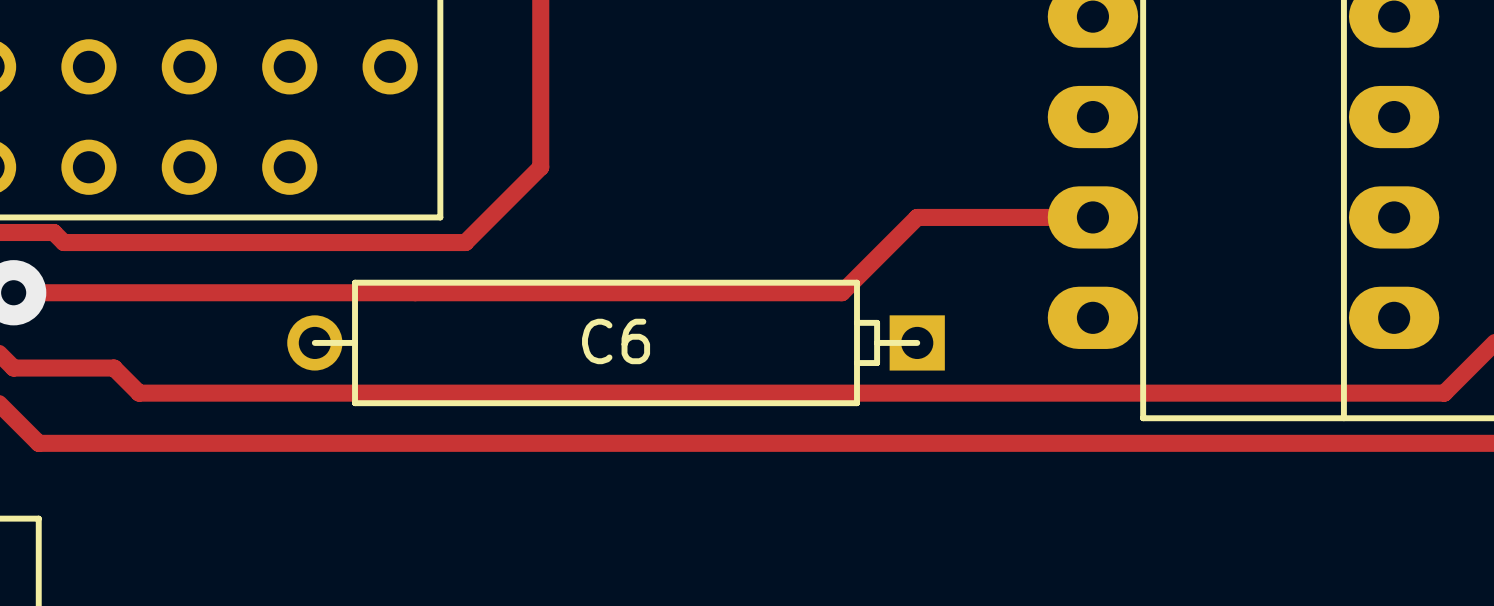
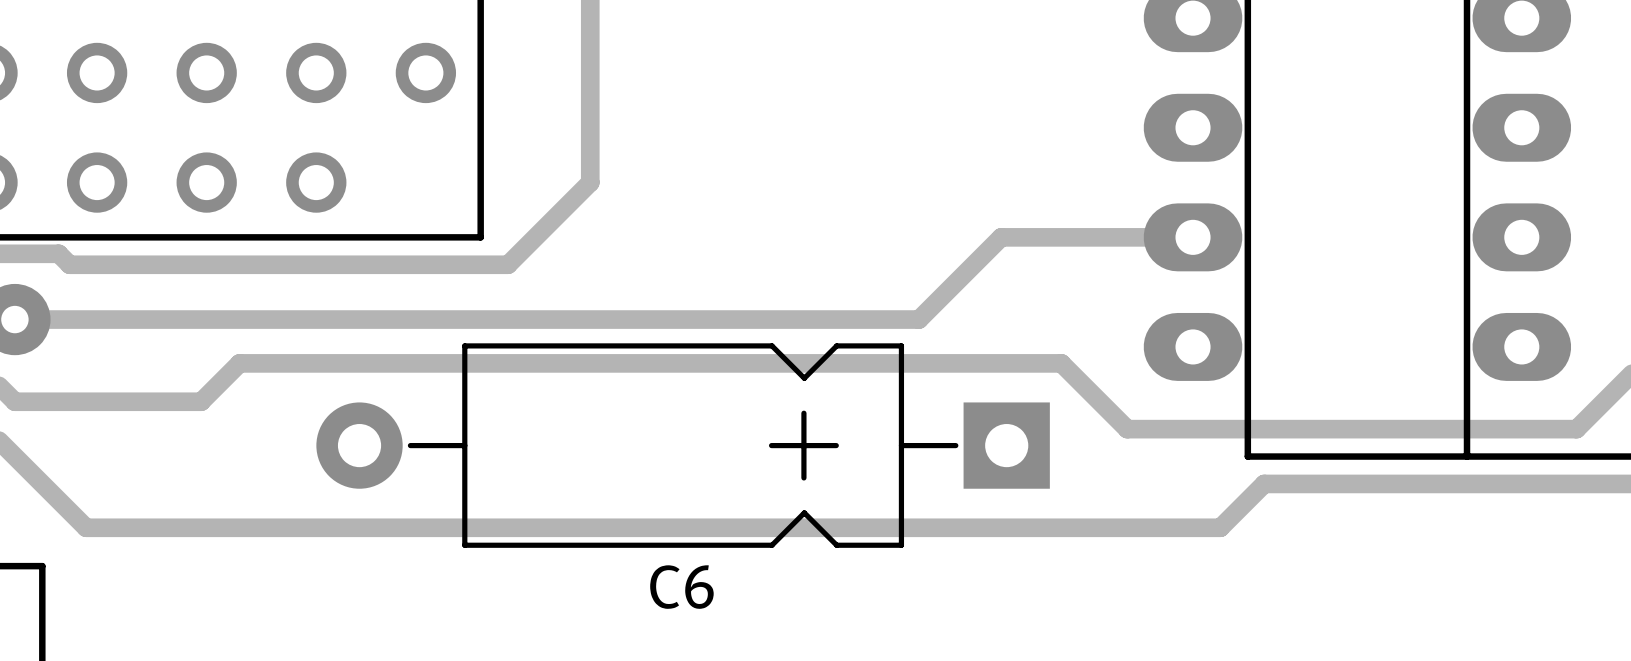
C6 footprint: [287, 279, 945, 407] -> [316, 343, 1050, 548]
C6 name position: C6 (616, 341) -> C6 (681, 587)
track: (114, 368) (139, 393) (1032, 393) -> (124, 401) (201, 401) (239, 363) (1061, 363) (1127, 429)
track: (38, 443) (1158, 443) -> (42, 483) (86, 527) (1220, 527) (1264, 483)

